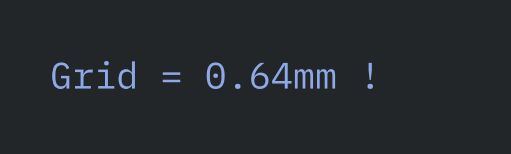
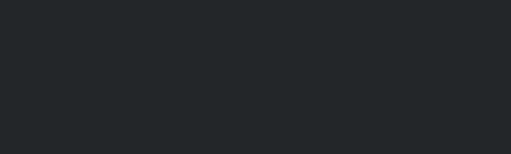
text: Grid = 0.64mm ! (212, 75) -> none

